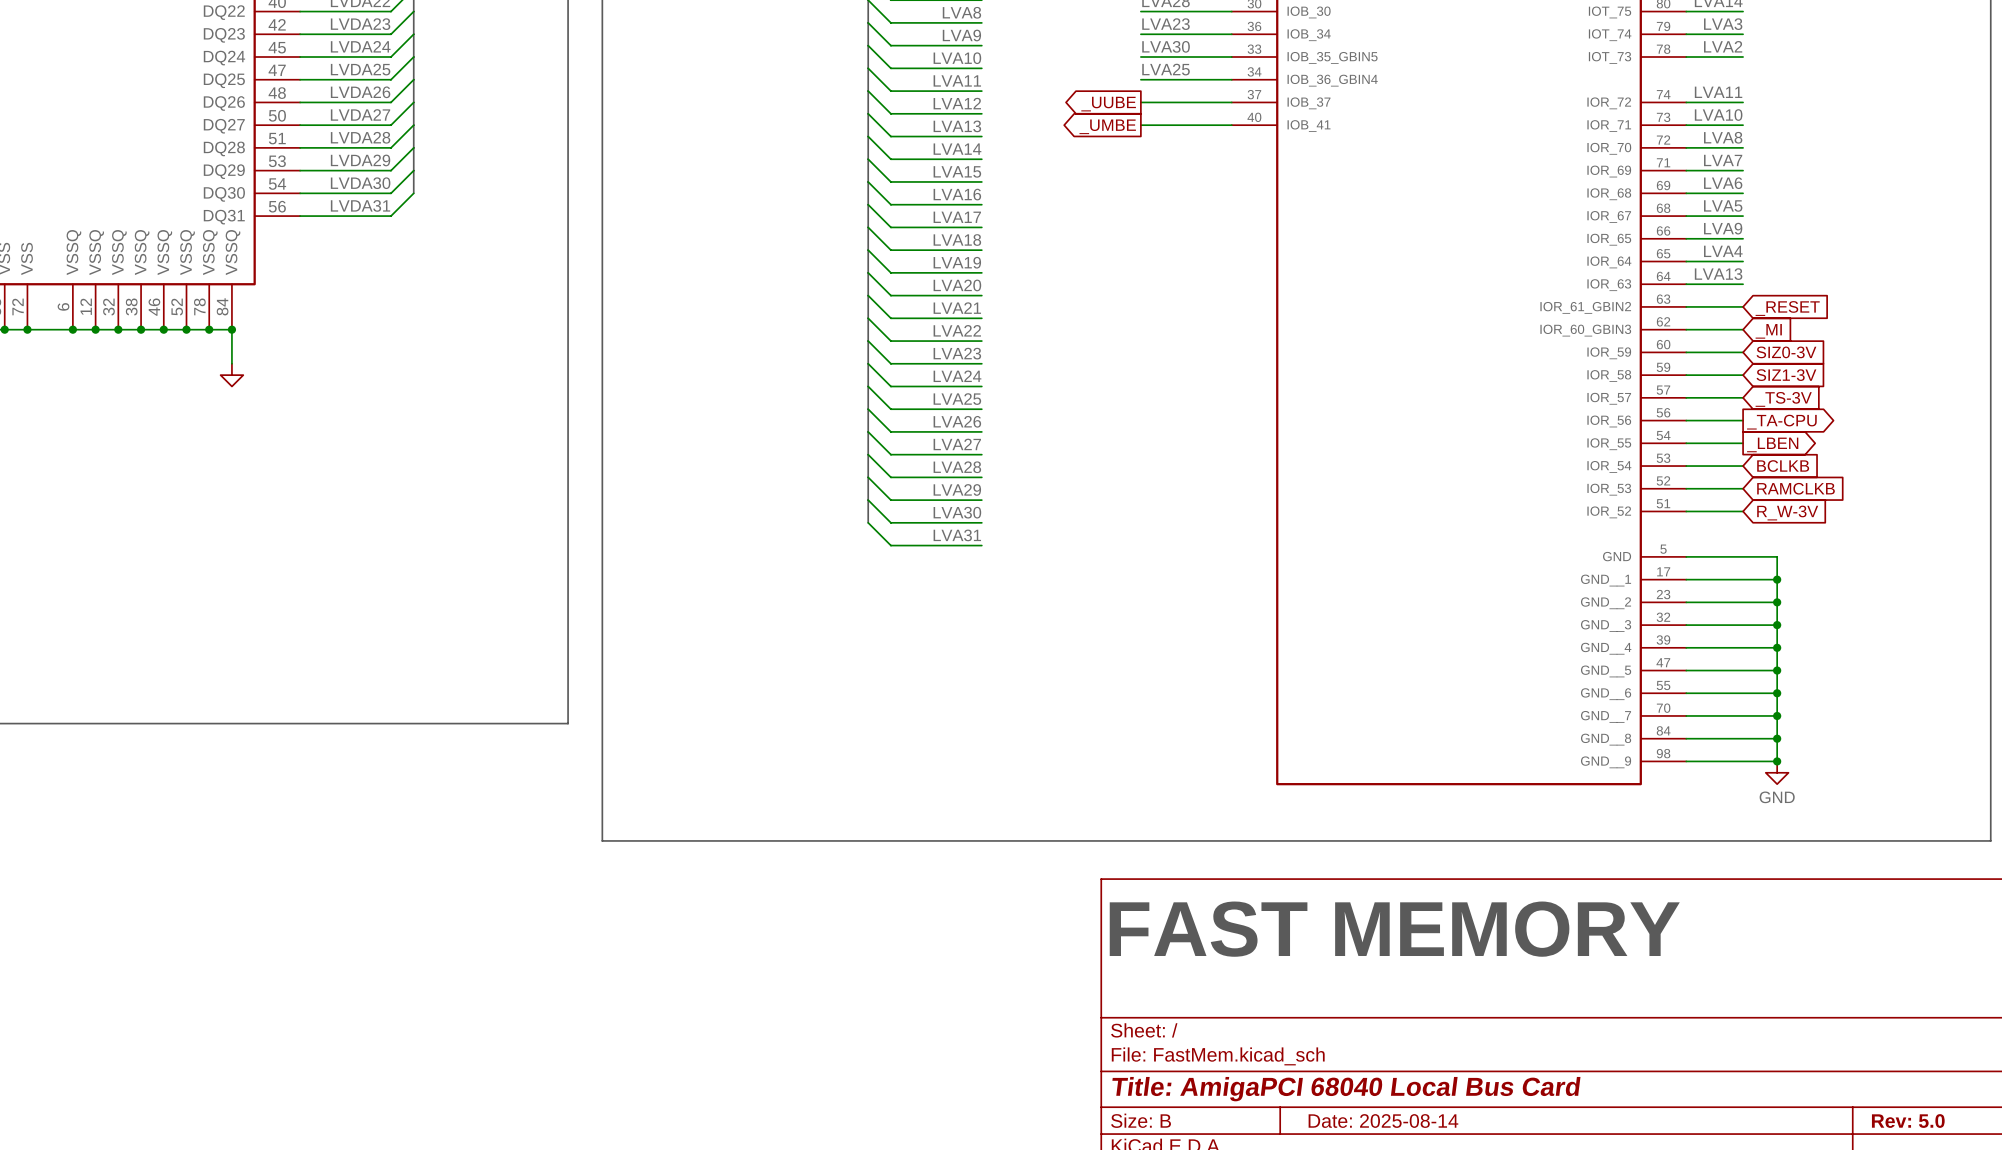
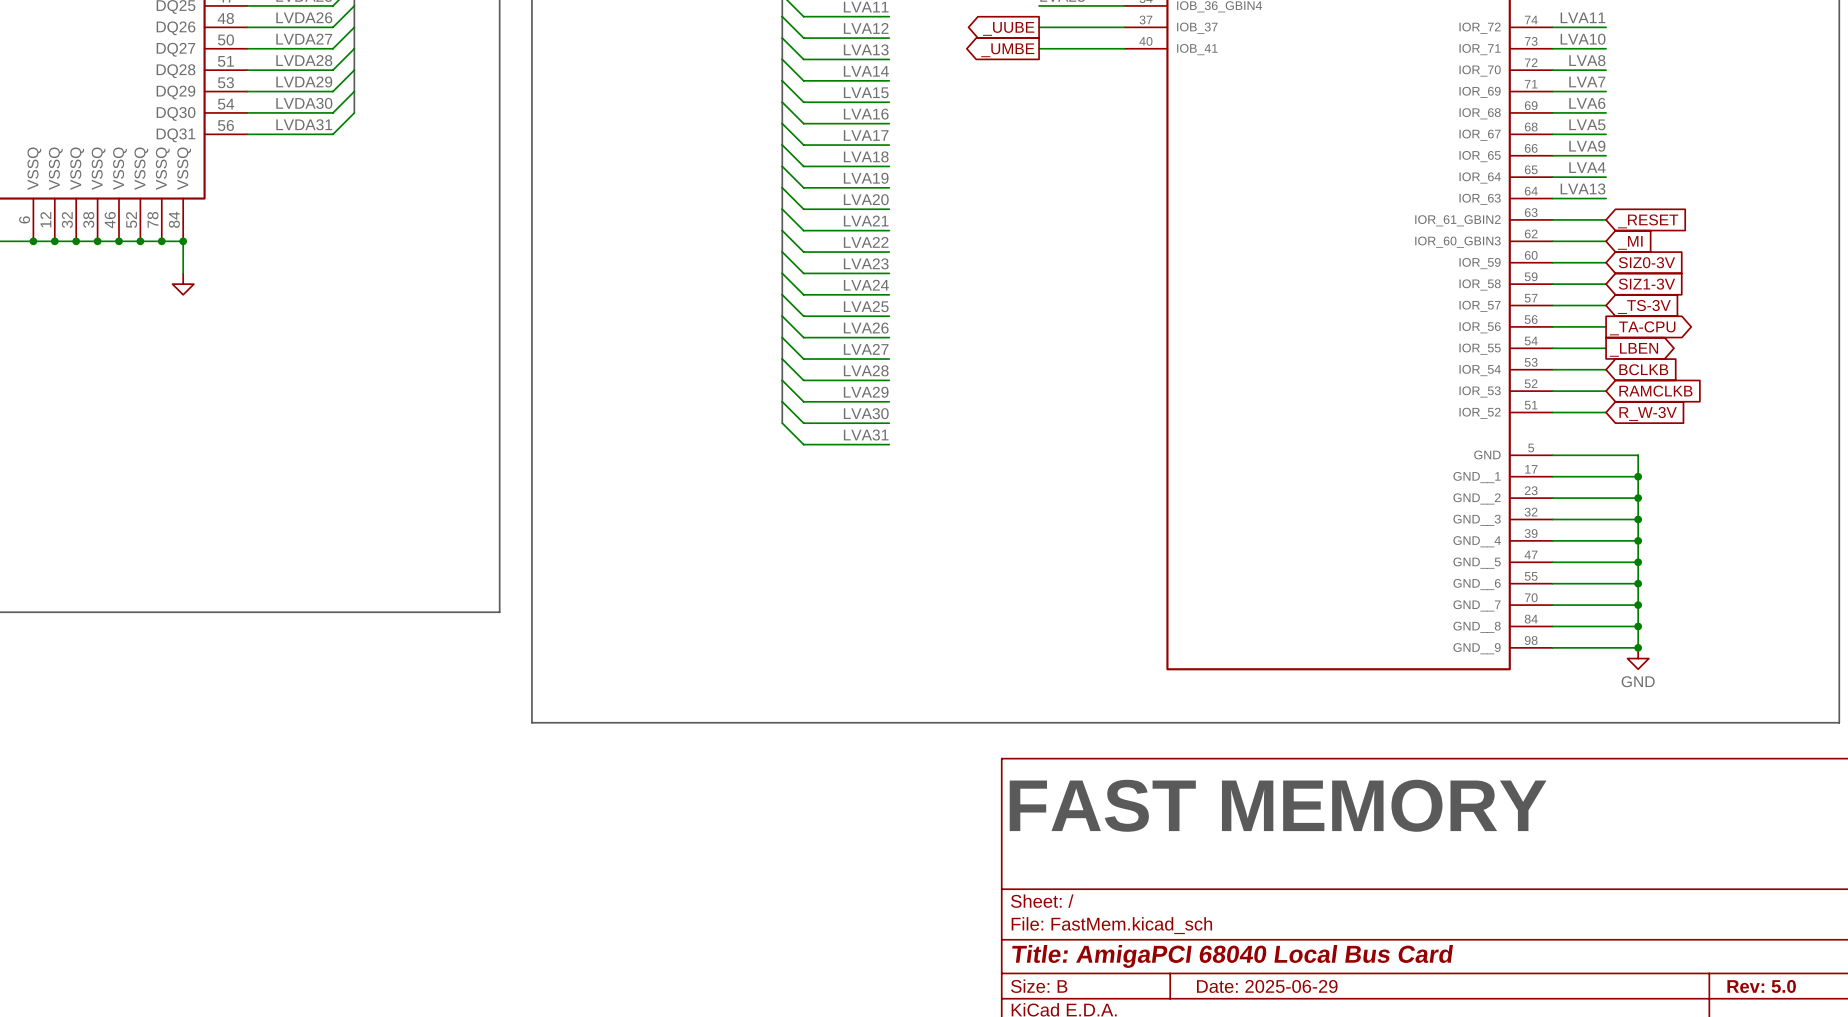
title block: Date: 2025-08-14 (1383, 1121) -> Date: 2025-06-29 (1267, 986)

